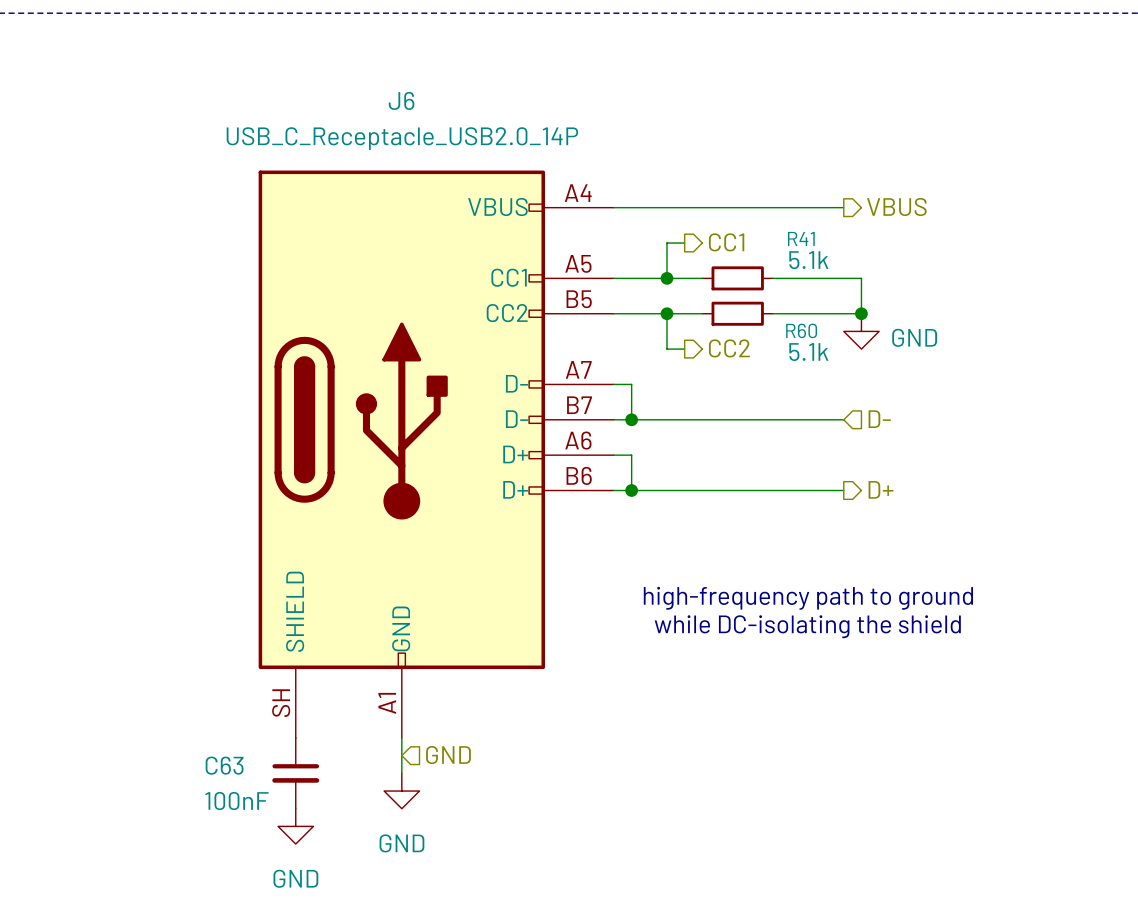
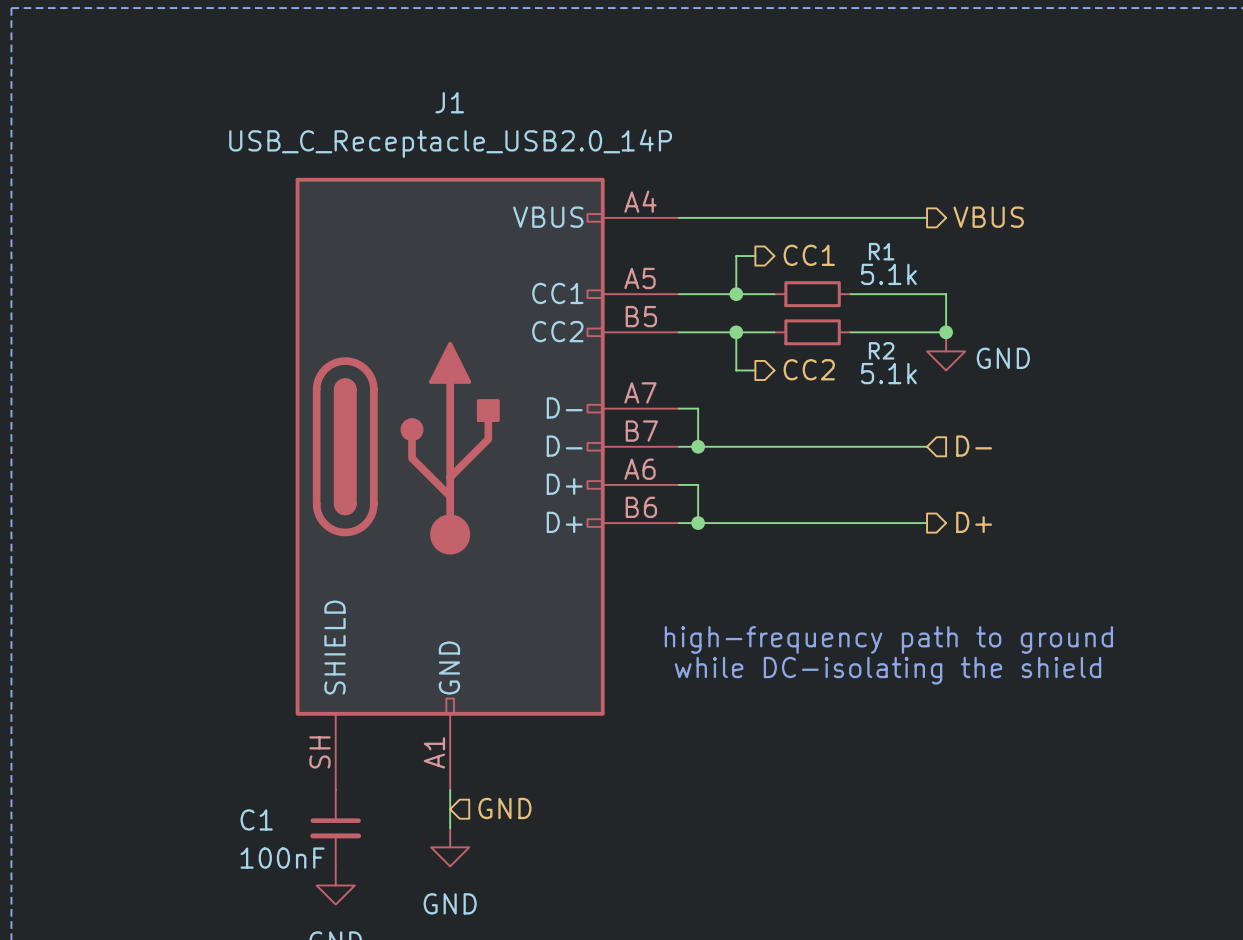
J6 name: J6 (401, 100) -> J1 (449, 102)
R41 name: R41 (801, 238) -> R1 (881, 251)
R60 name: R60 (801, 330) -> R2 (881, 350)
C63 name: C63 (224, 765) -> C1 (256, 819)

